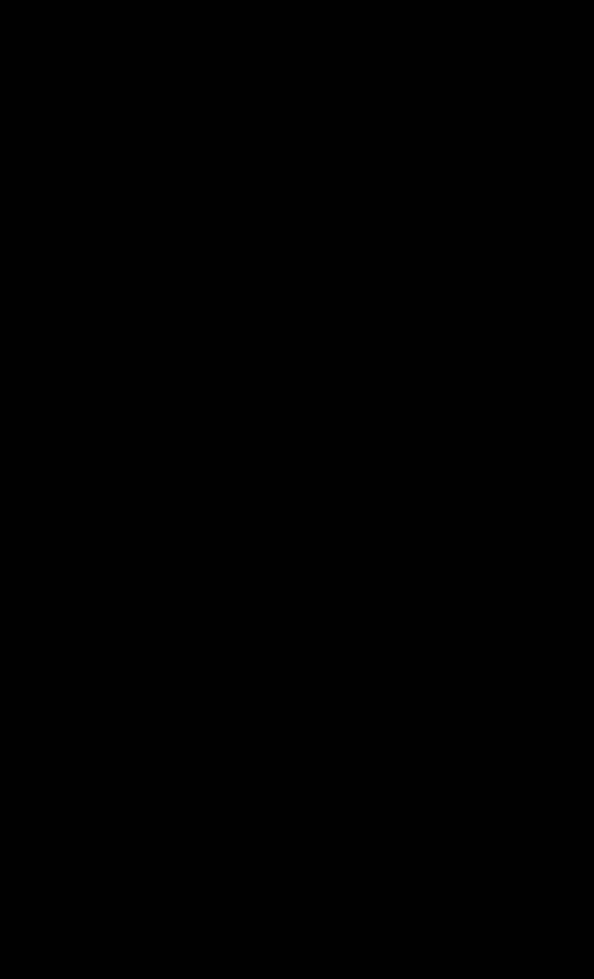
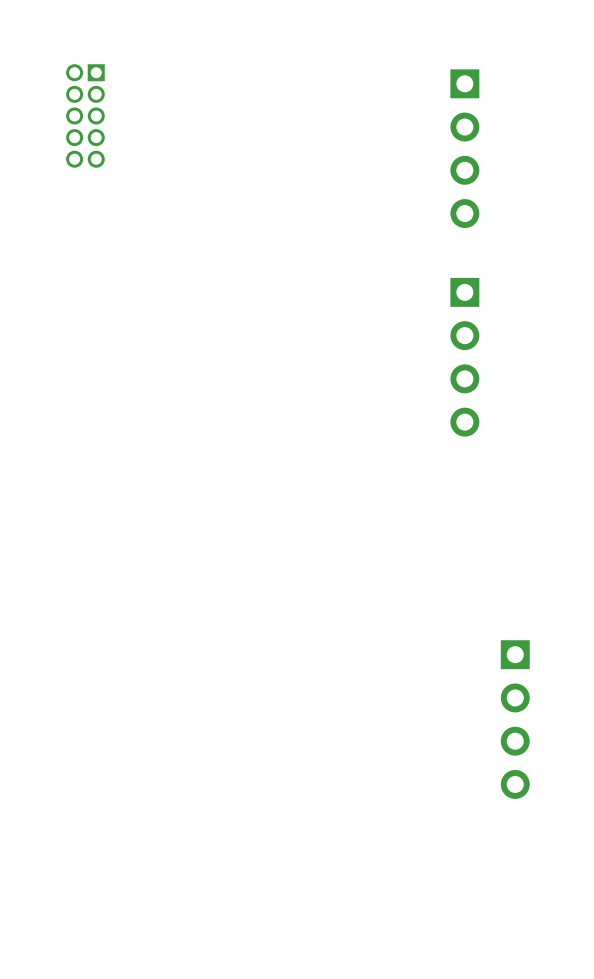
part: none -> (85, 115)
part: none -> (464, 148)
part: none -> (464, 357)
part: none -> (515, 719)

